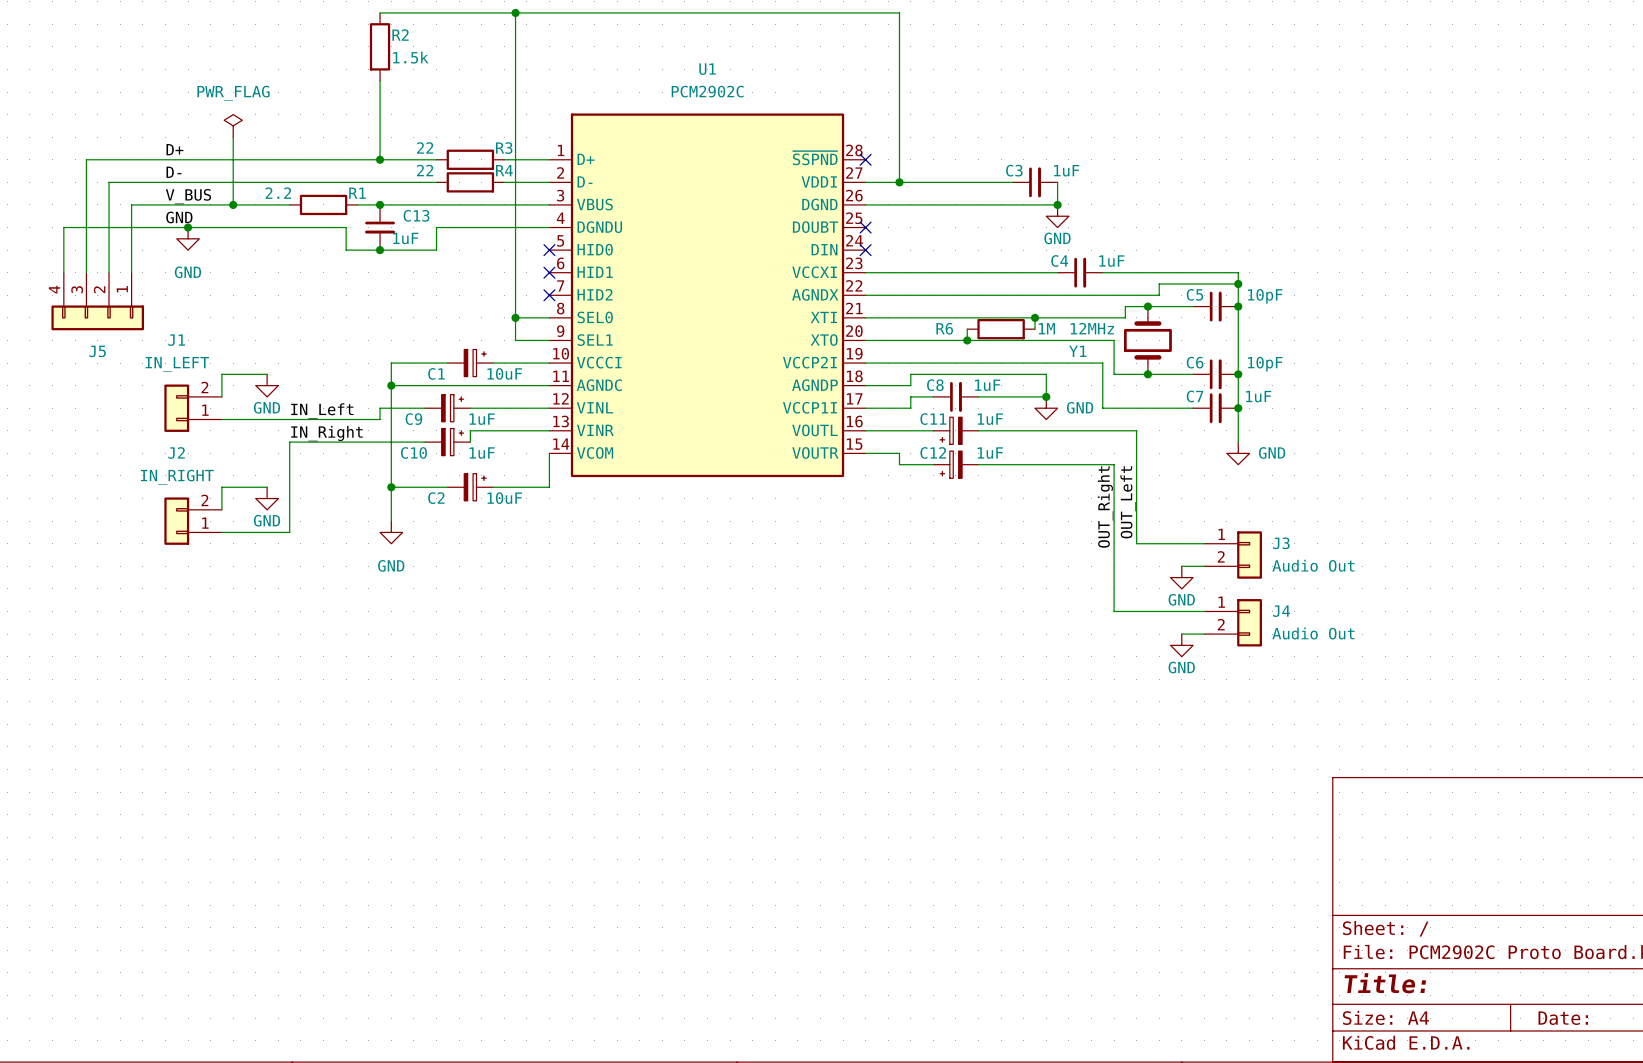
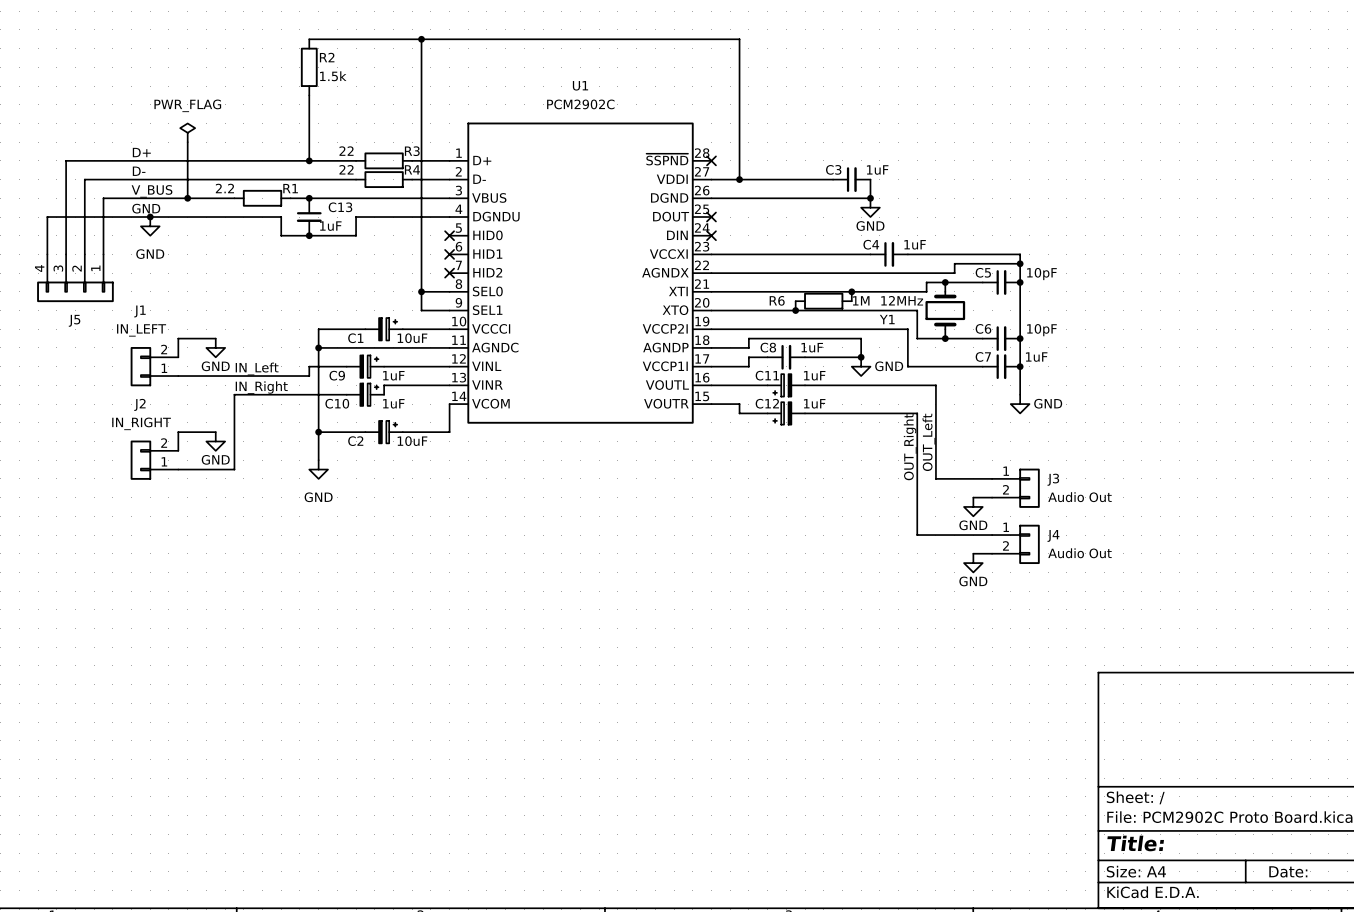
U1 pin name: DOUBT (815, 227) -> DOUT (671, 216)

